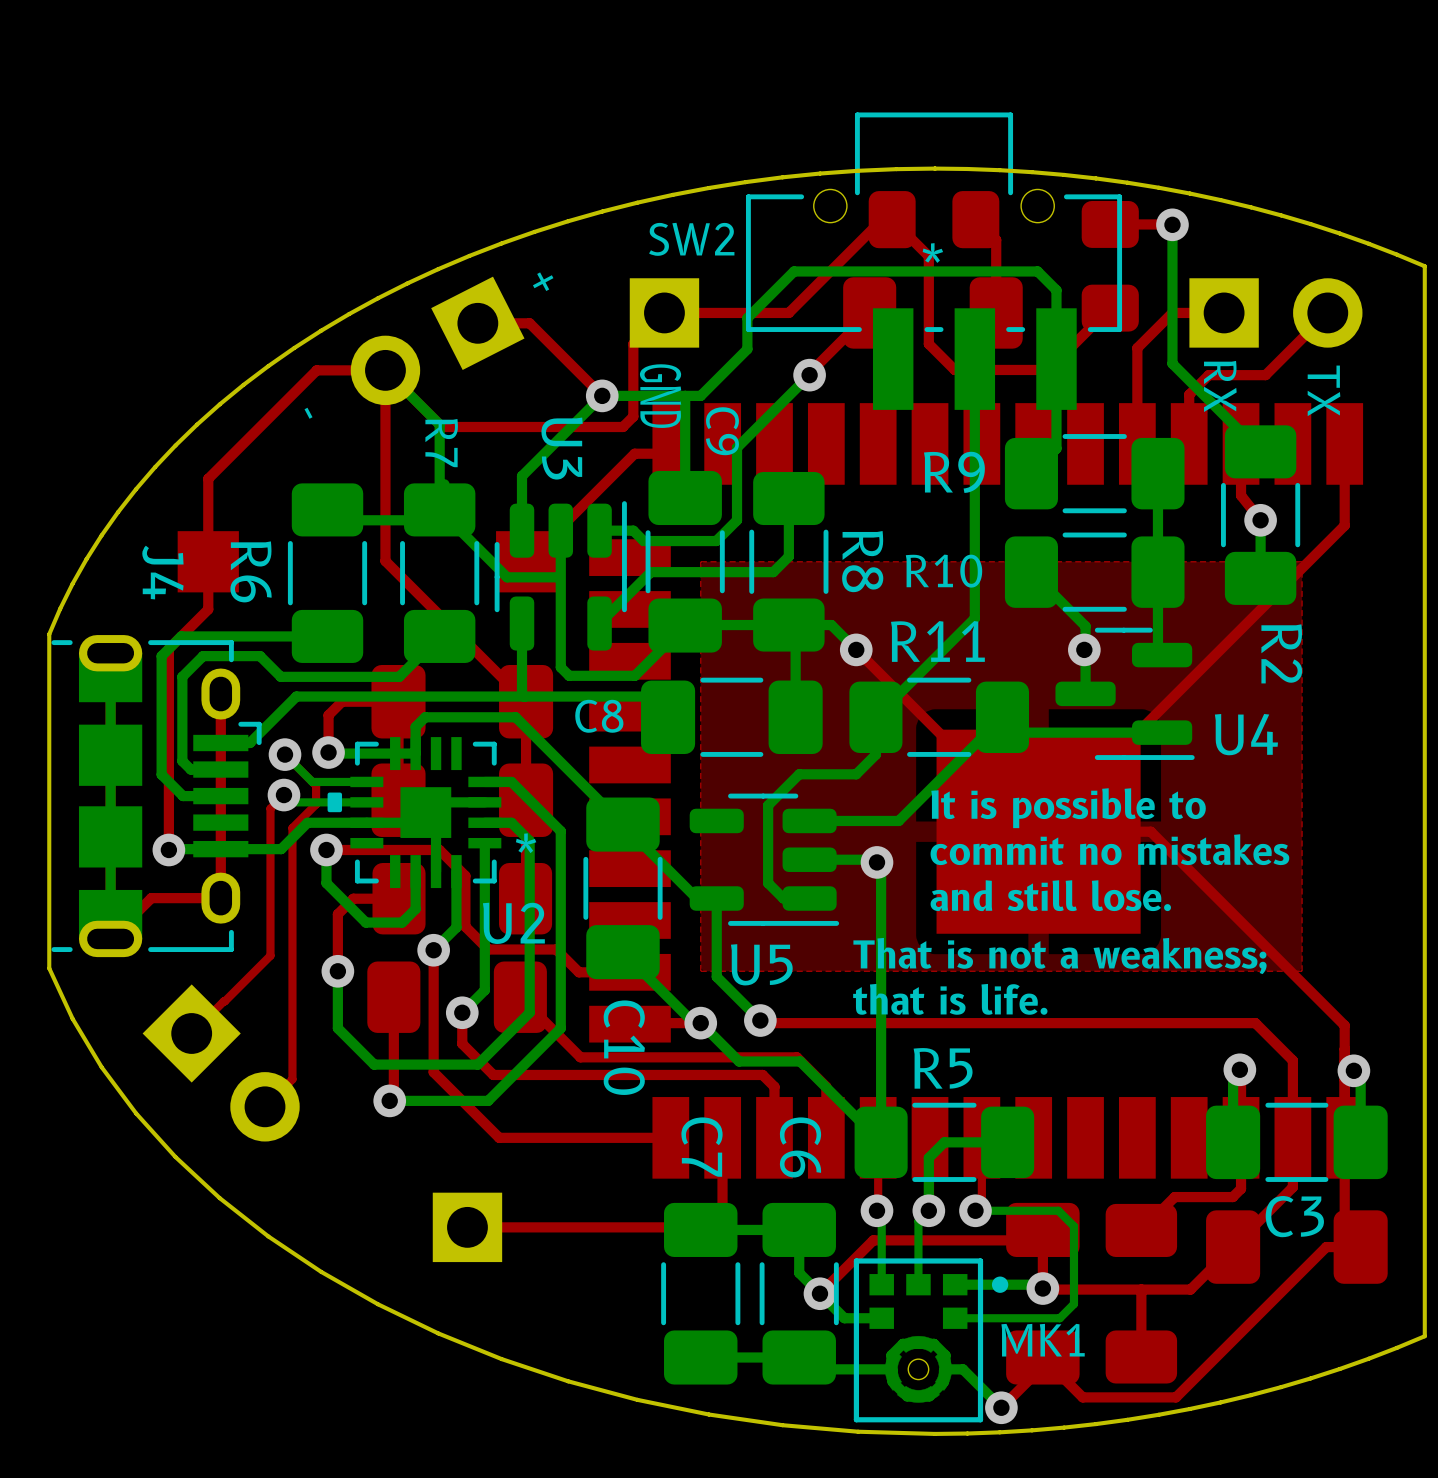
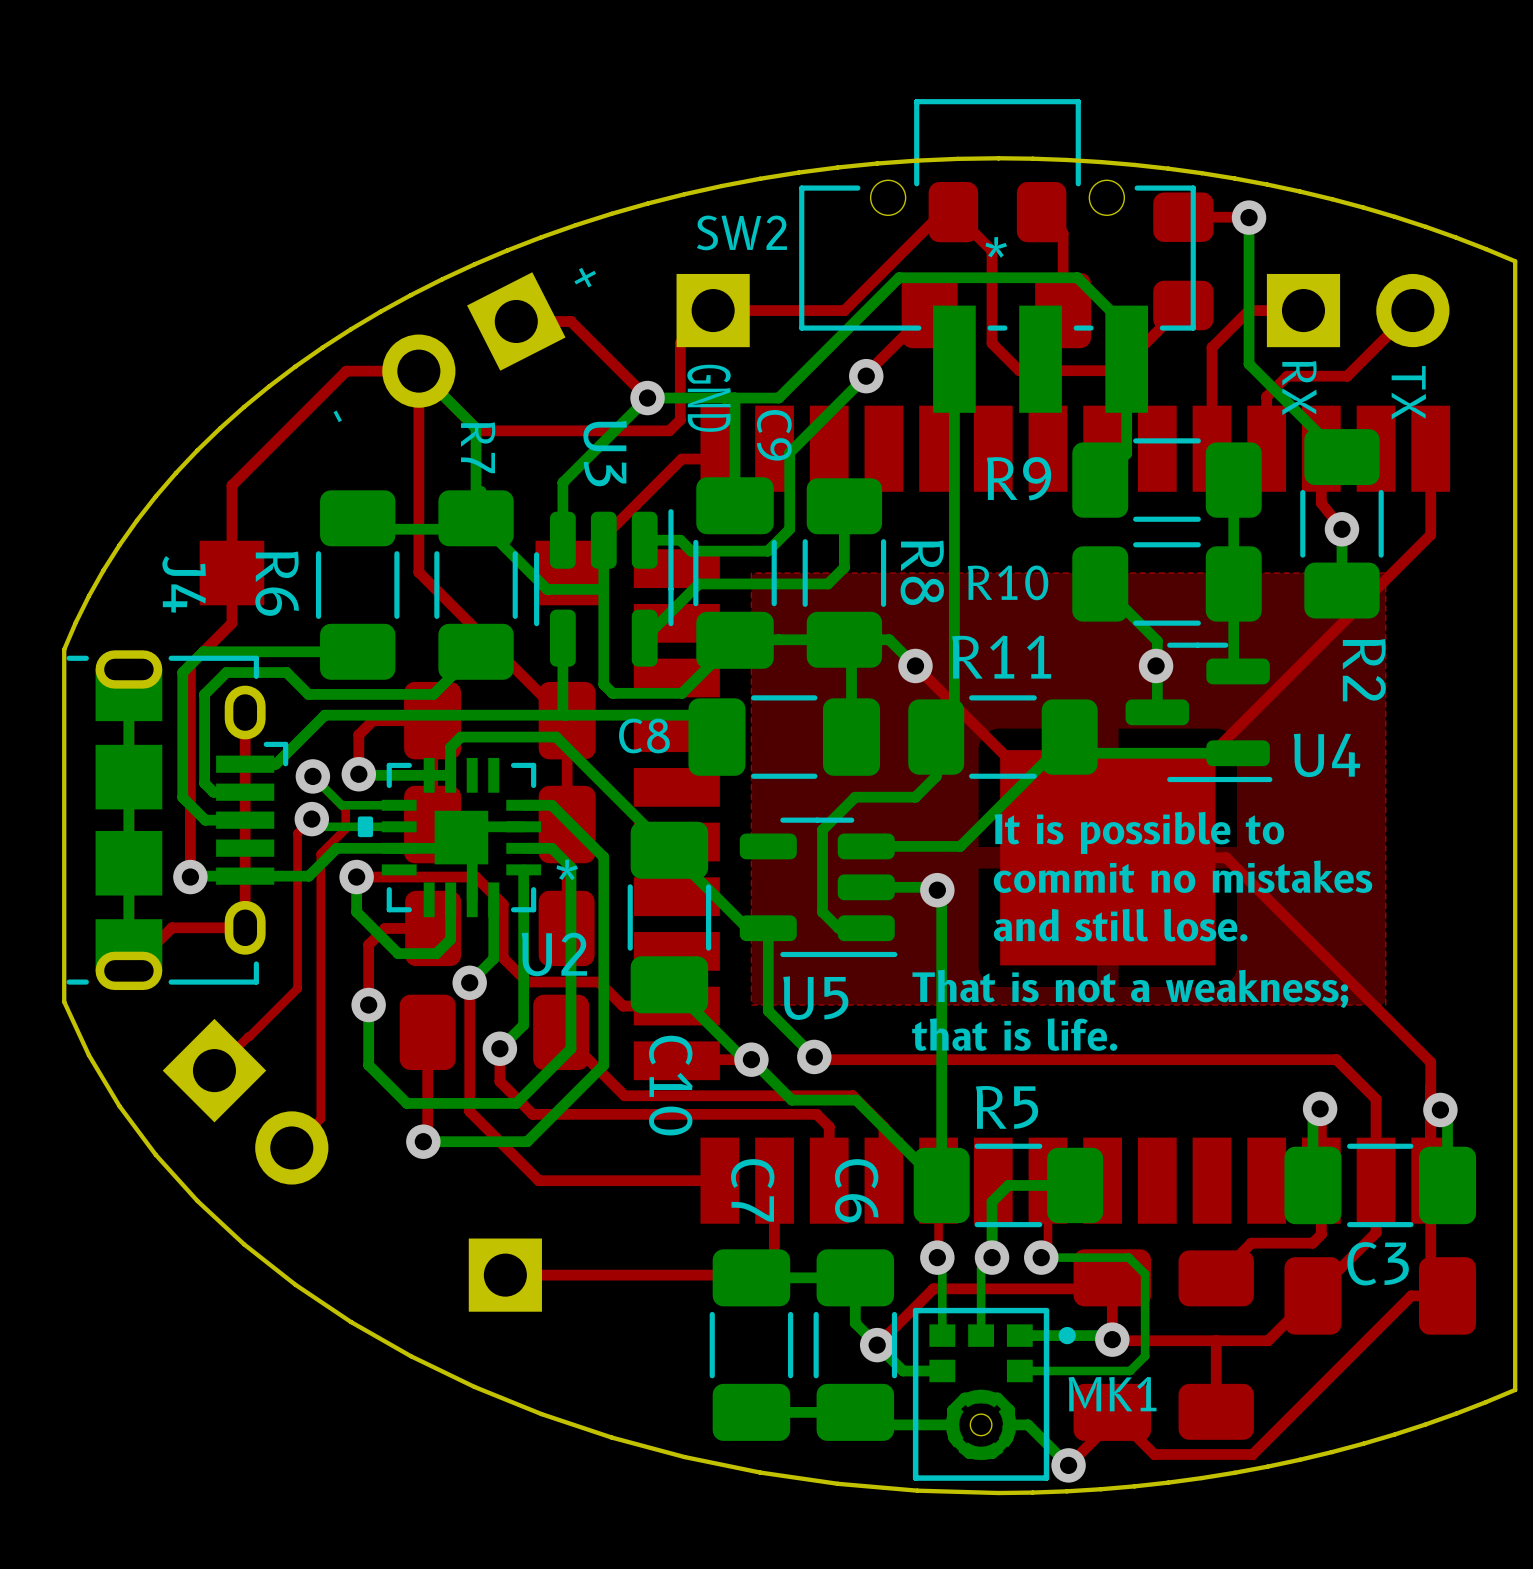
bottom track: (1056, 328) (1056, 290) (1037, 271) (794, 271) (747, 318) (747, 349) (700, 395) -> (1126, 326) (1077, 277) (899, 277) (778, 398) (751, 398)
bottom track: (974, 359) (974, 618) (893, 700) -> (954, 359) (954, 718)

